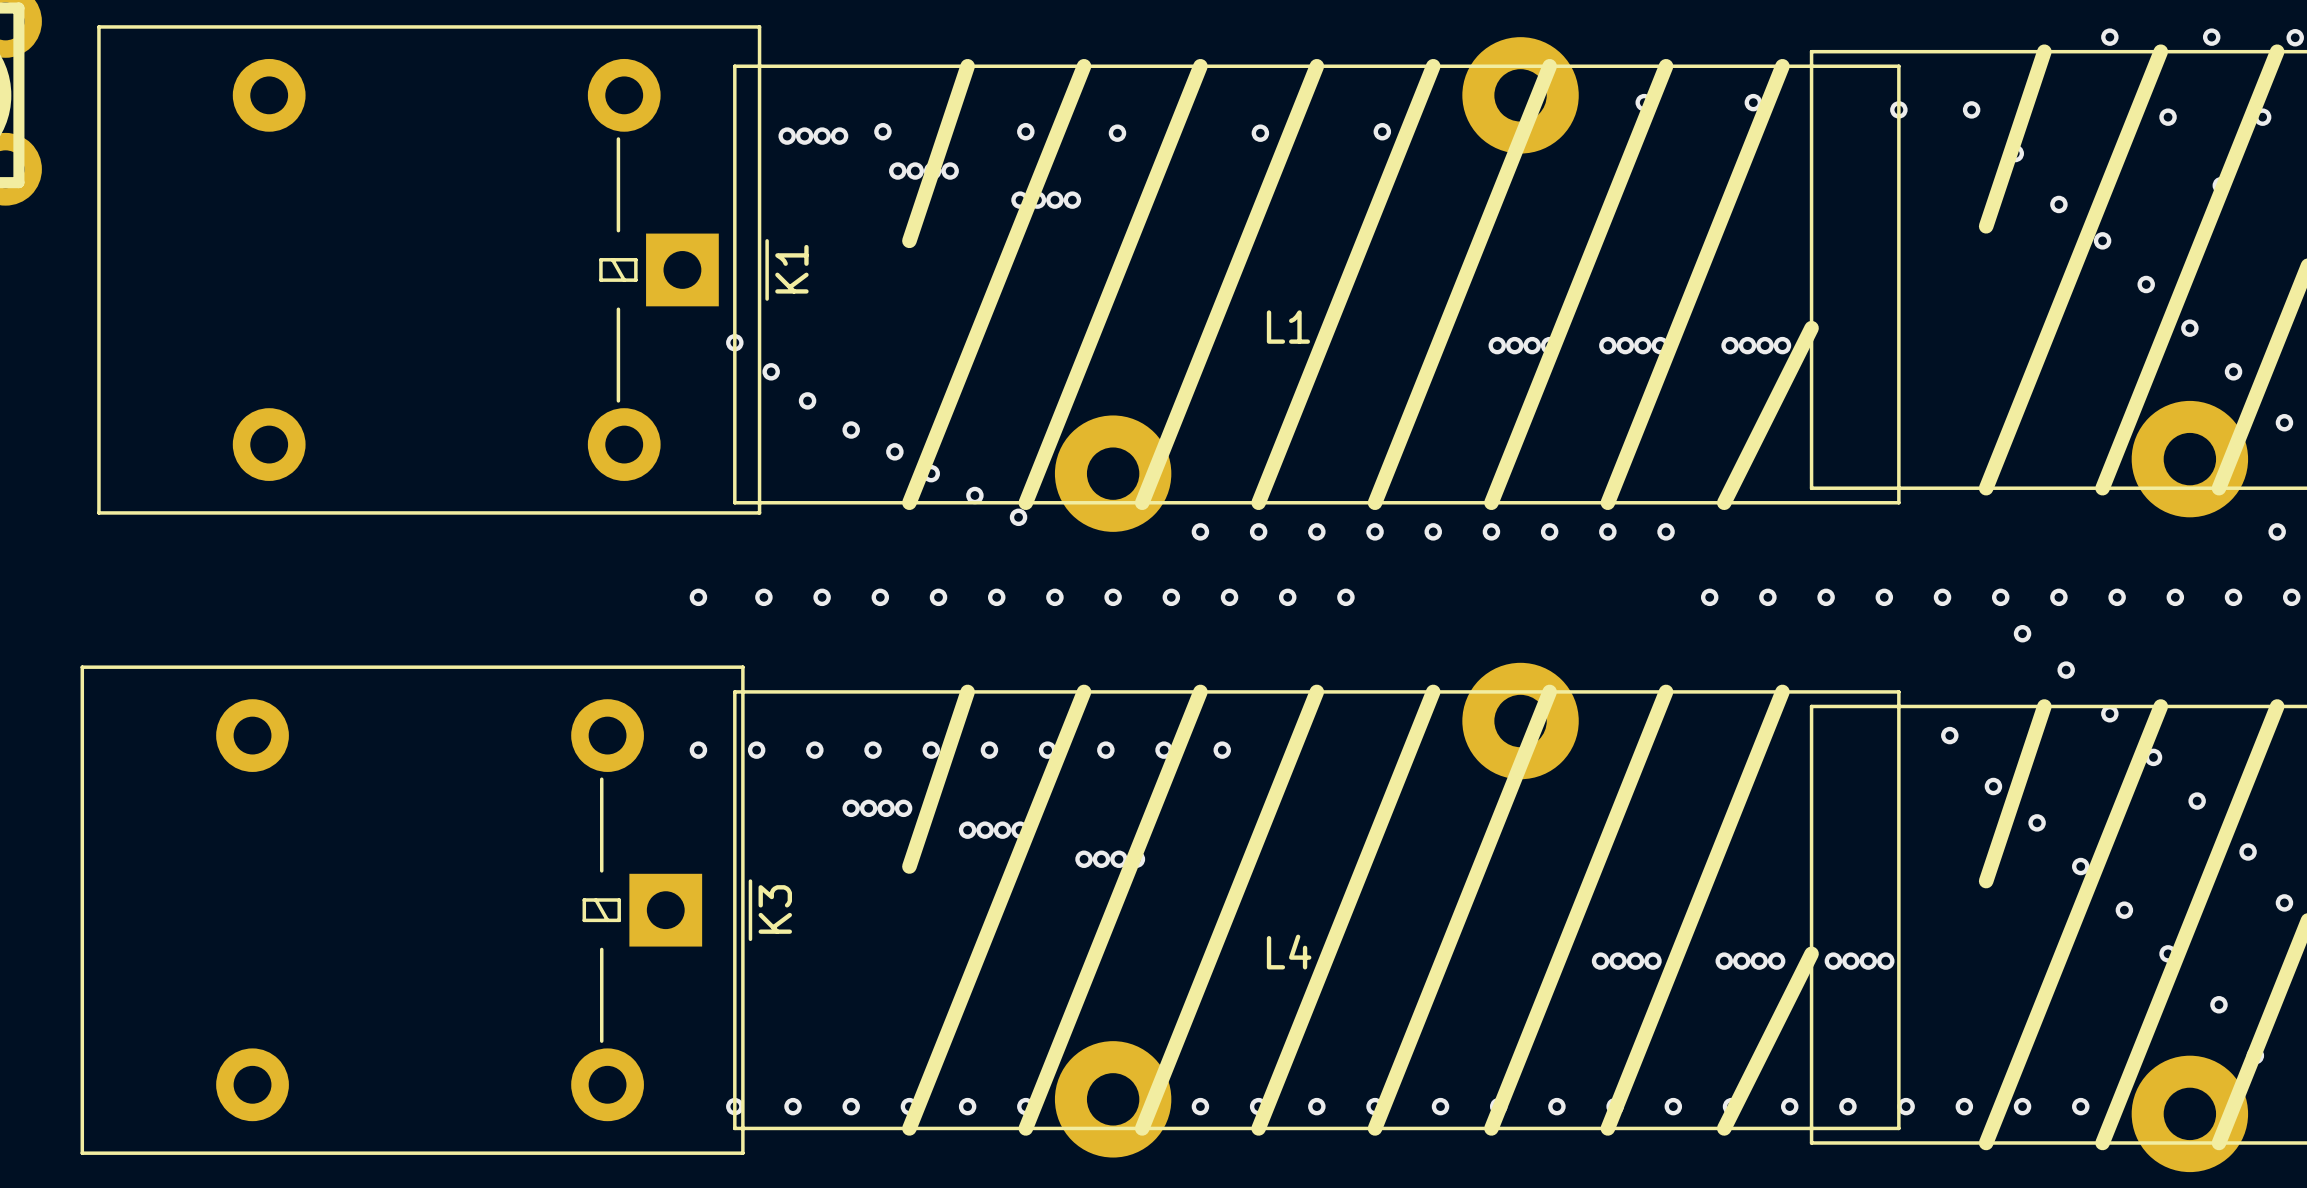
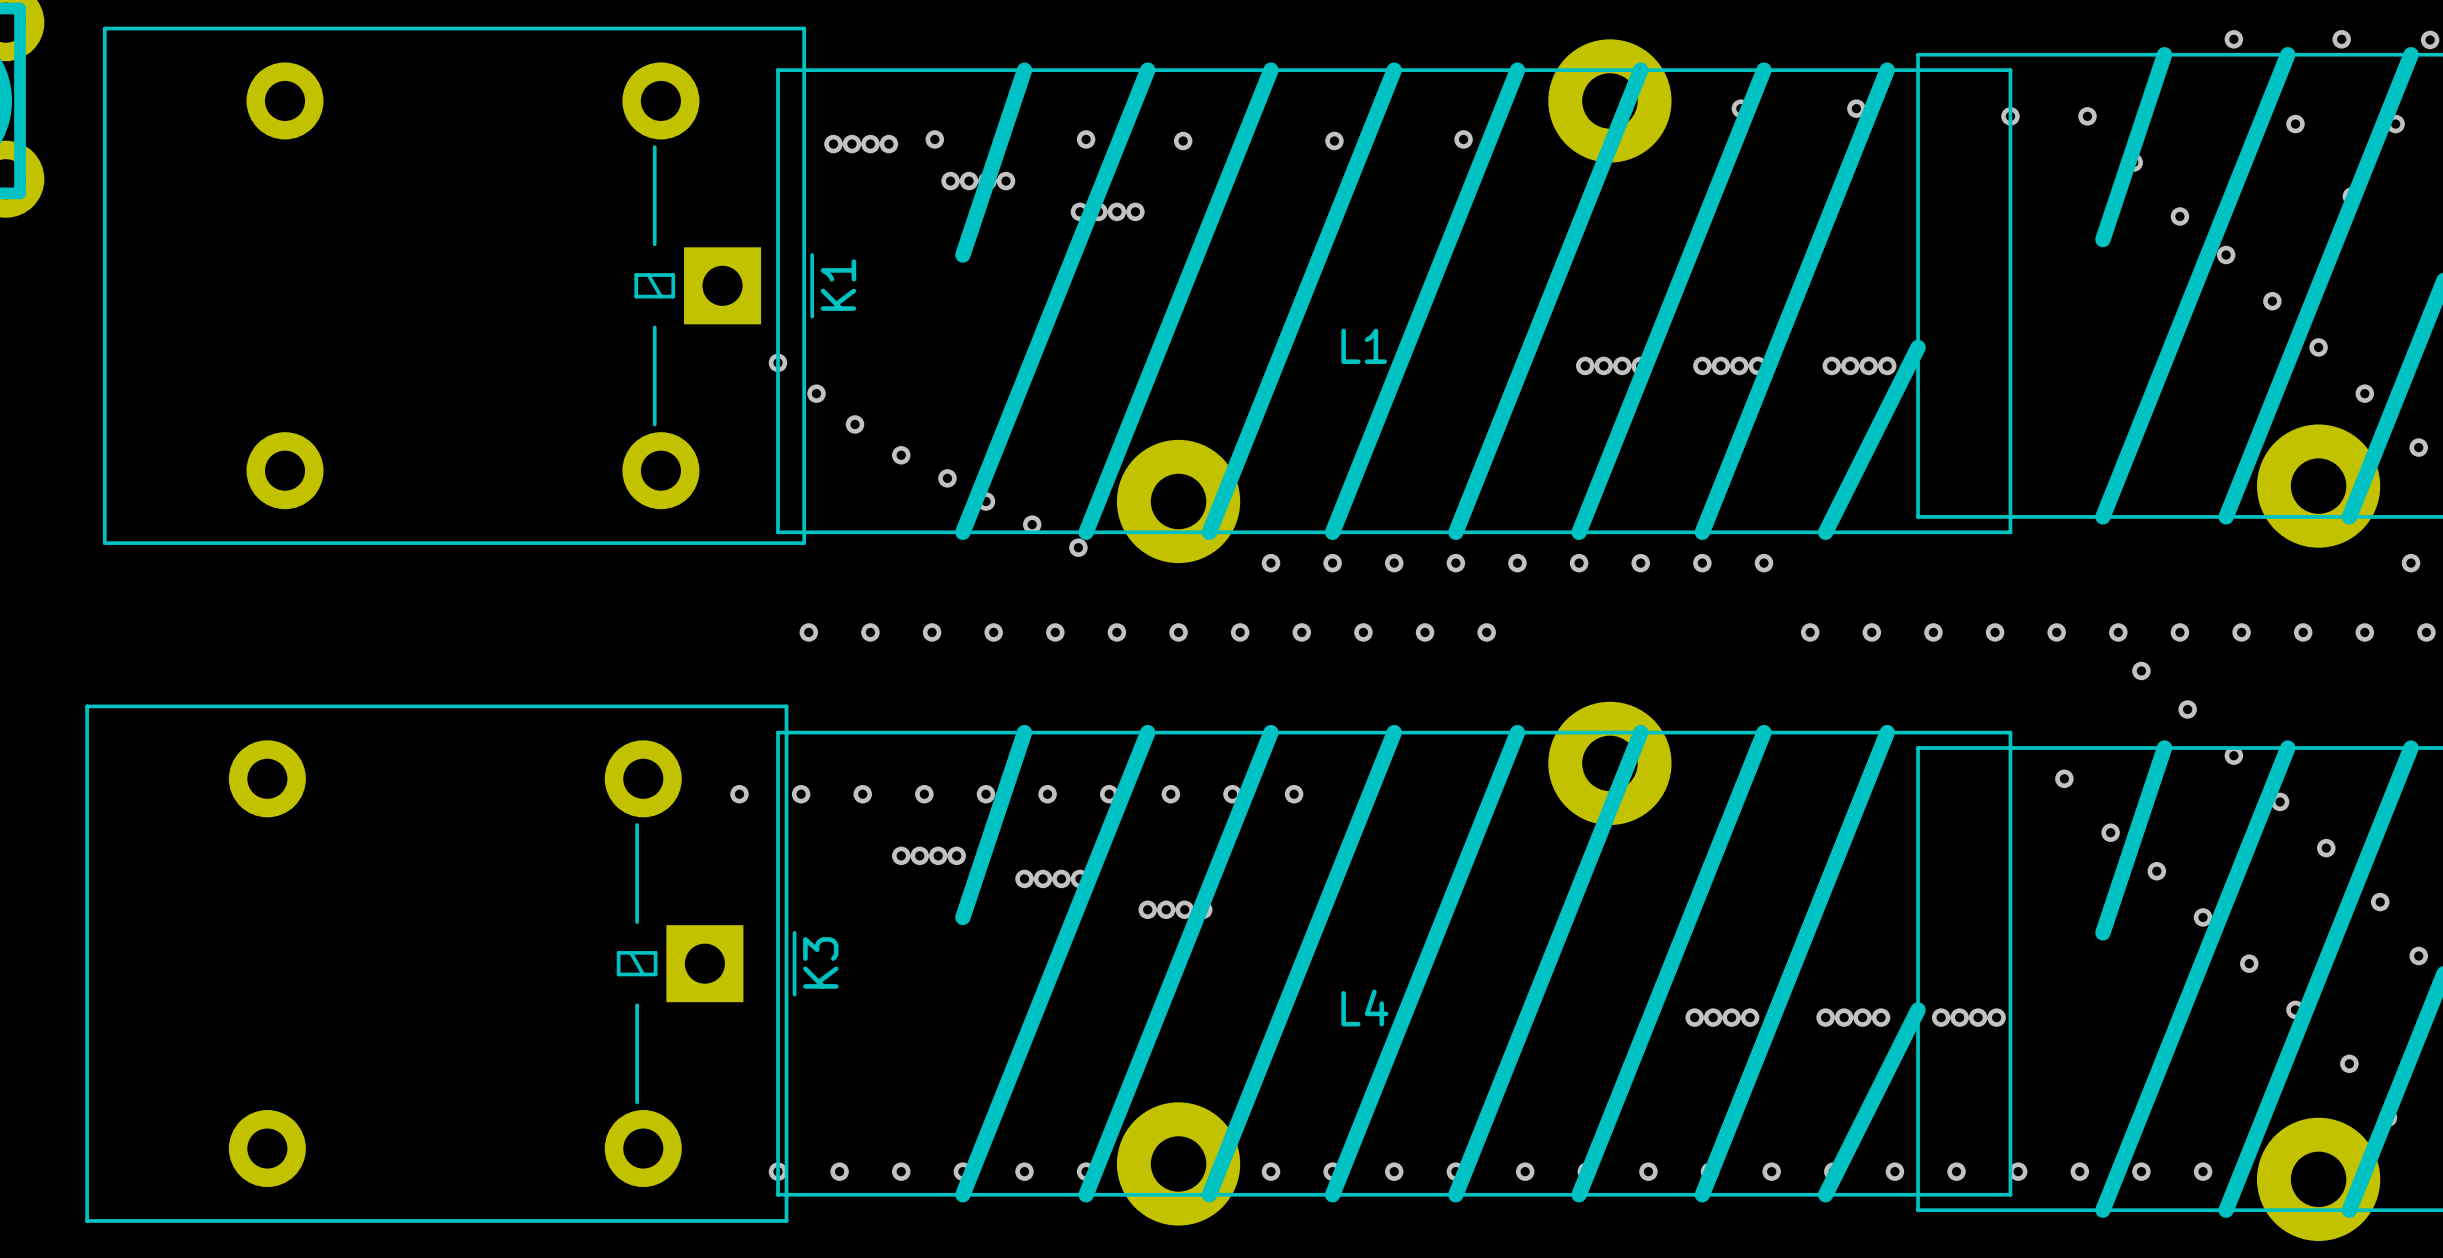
via: (698, 597) -> none
via: none -> (1486, 632)

